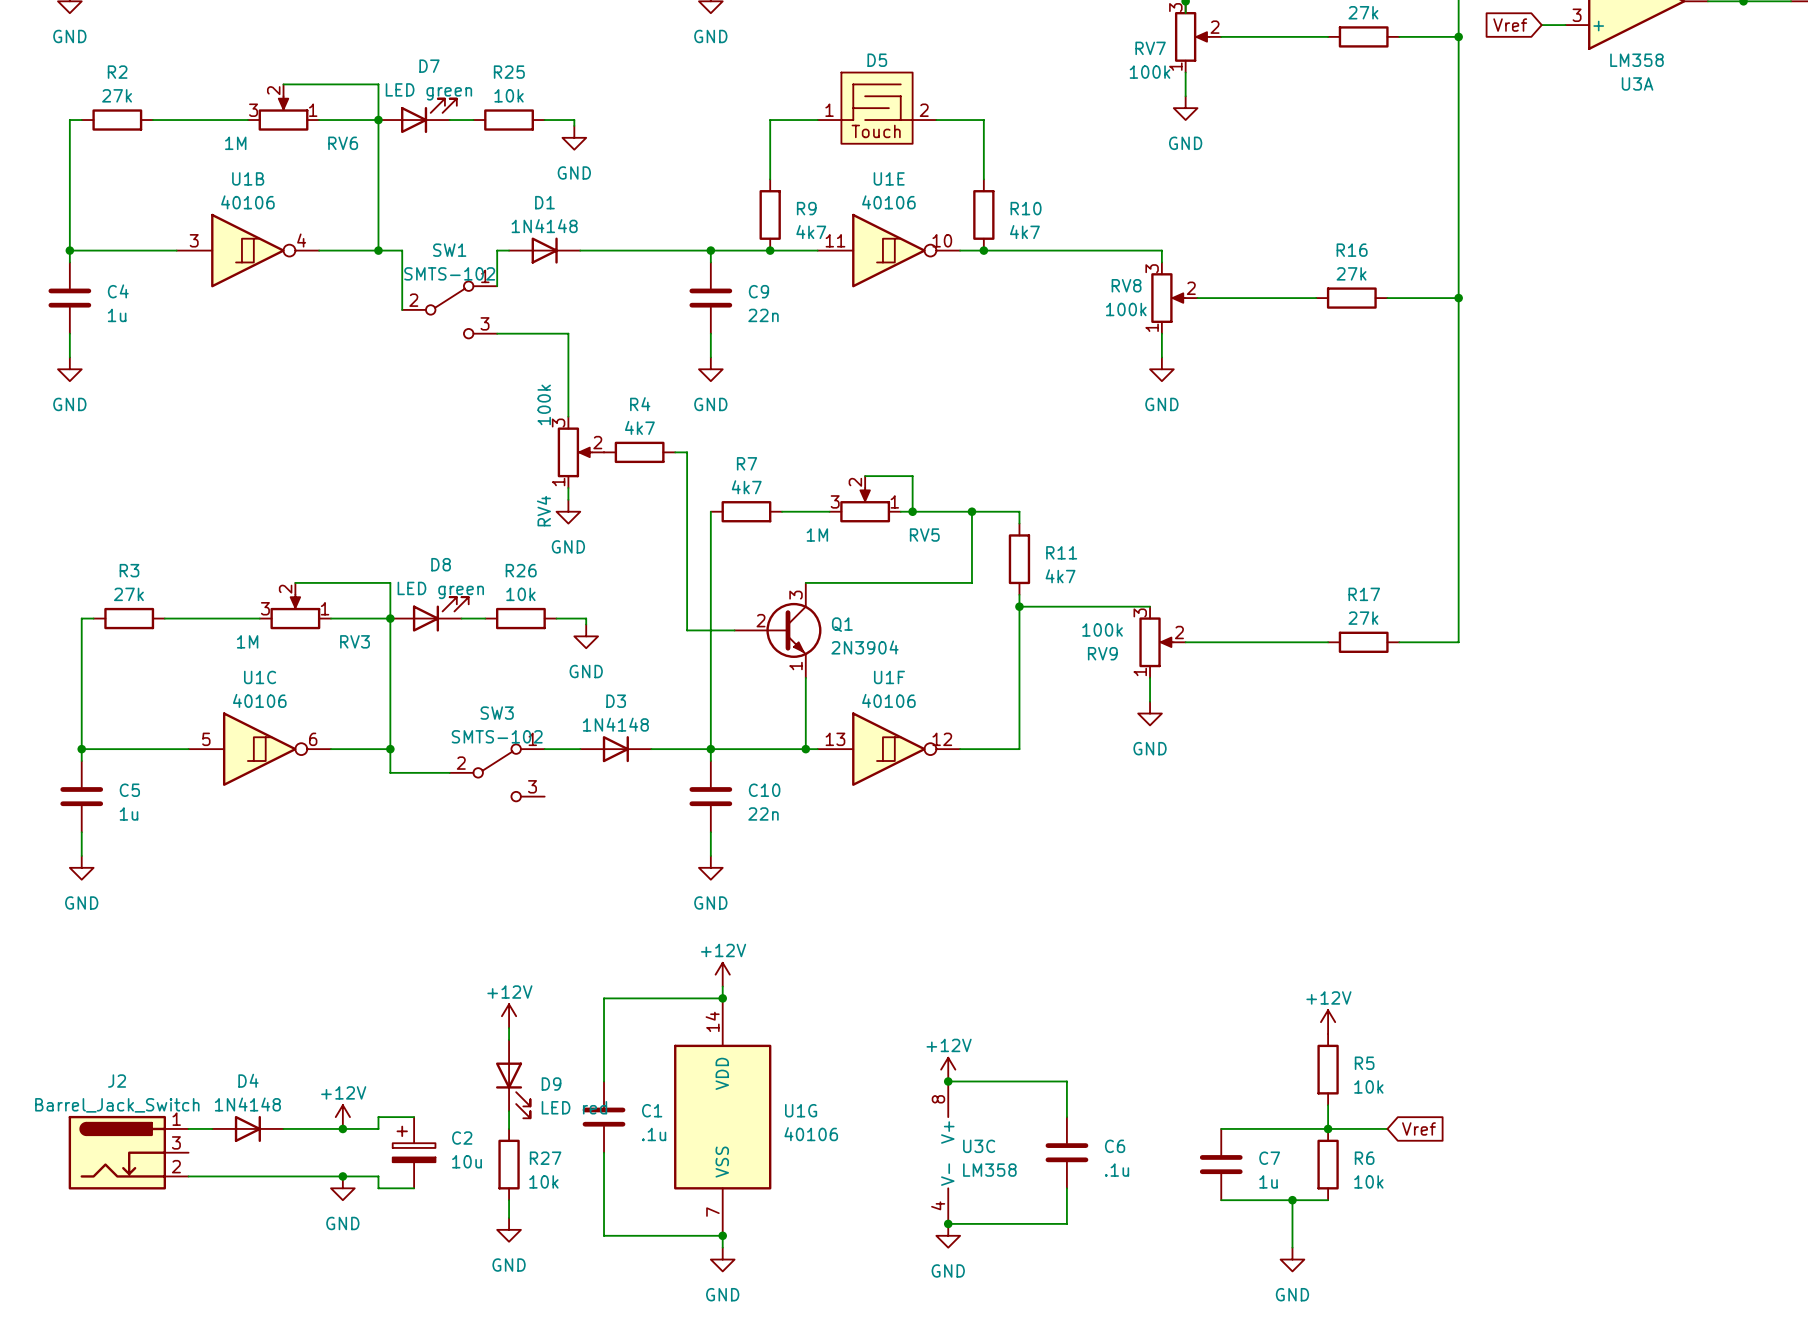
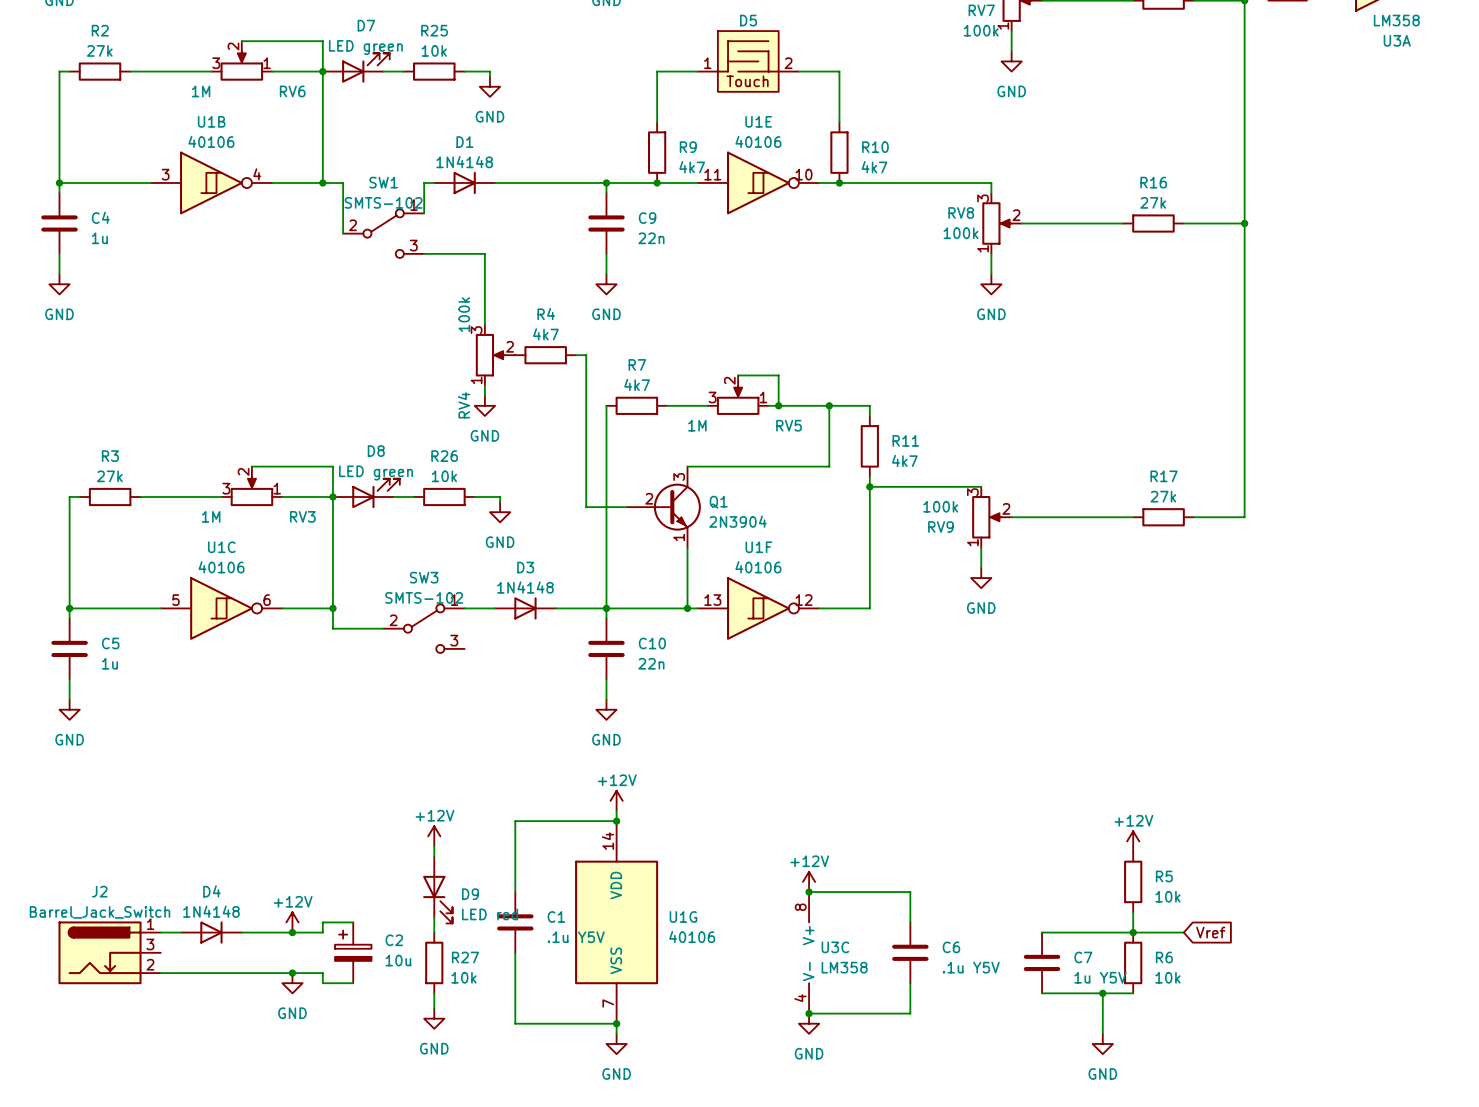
C1 value: .1u (654, 1134) -> .1u Y5V (576, 937)
C6 value: .1u (1117, 1170) -> .1u Y5V (971, 967)
C7 value: 1u (1268, 1181) -> 1u Y5V (1100, 977)

